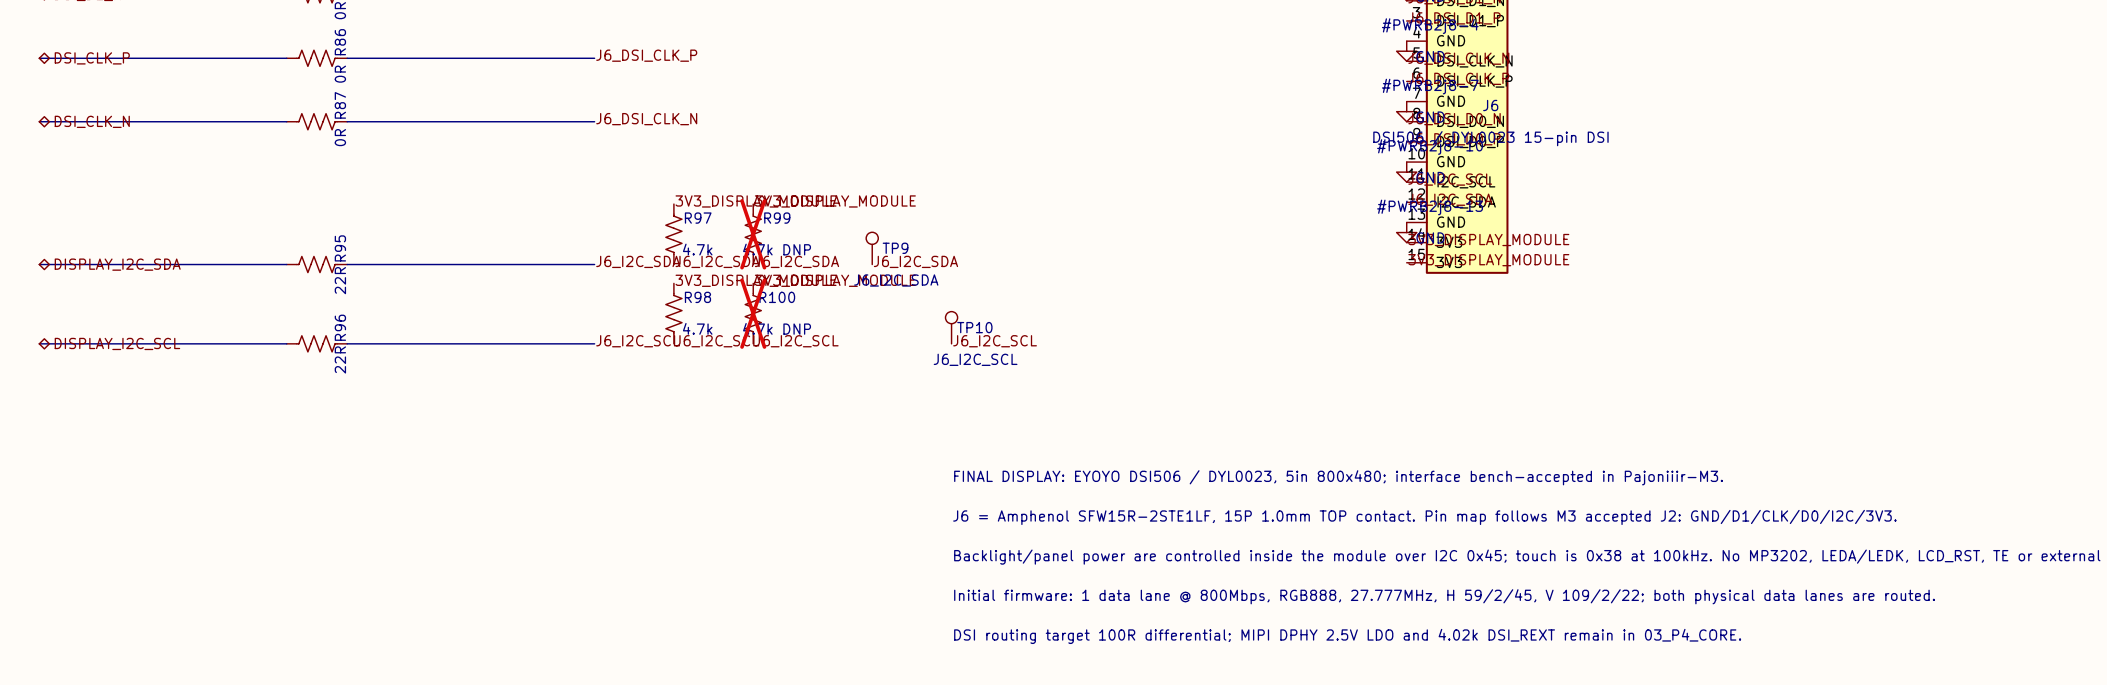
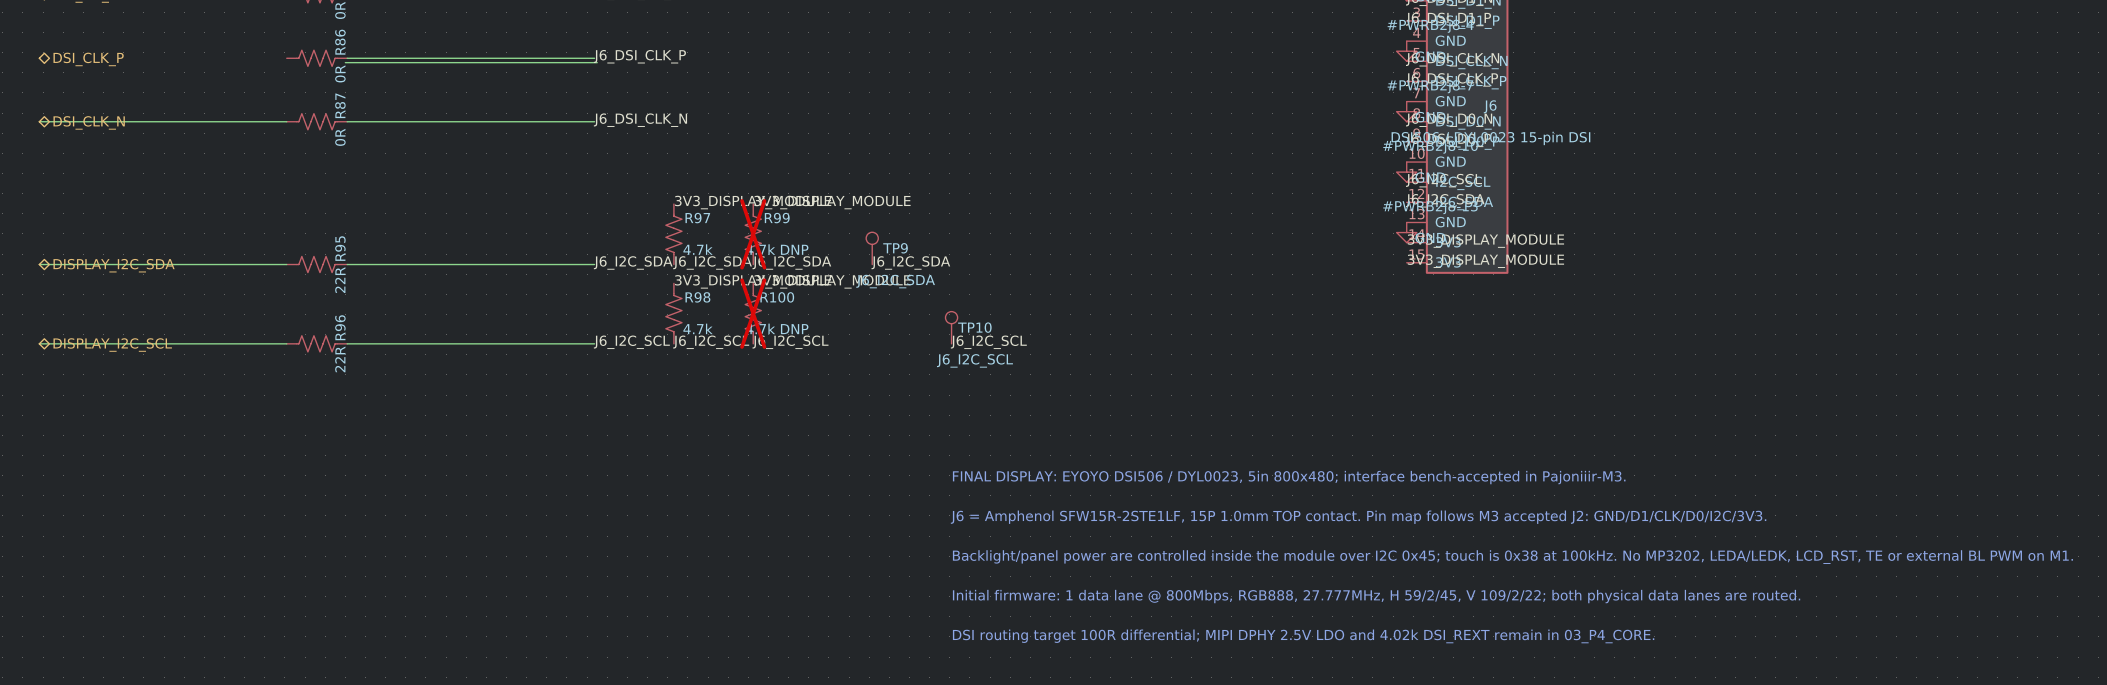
wire: (39, 58) (286, 58) -> none
wire: none -> (345, 62) (597, 62)

